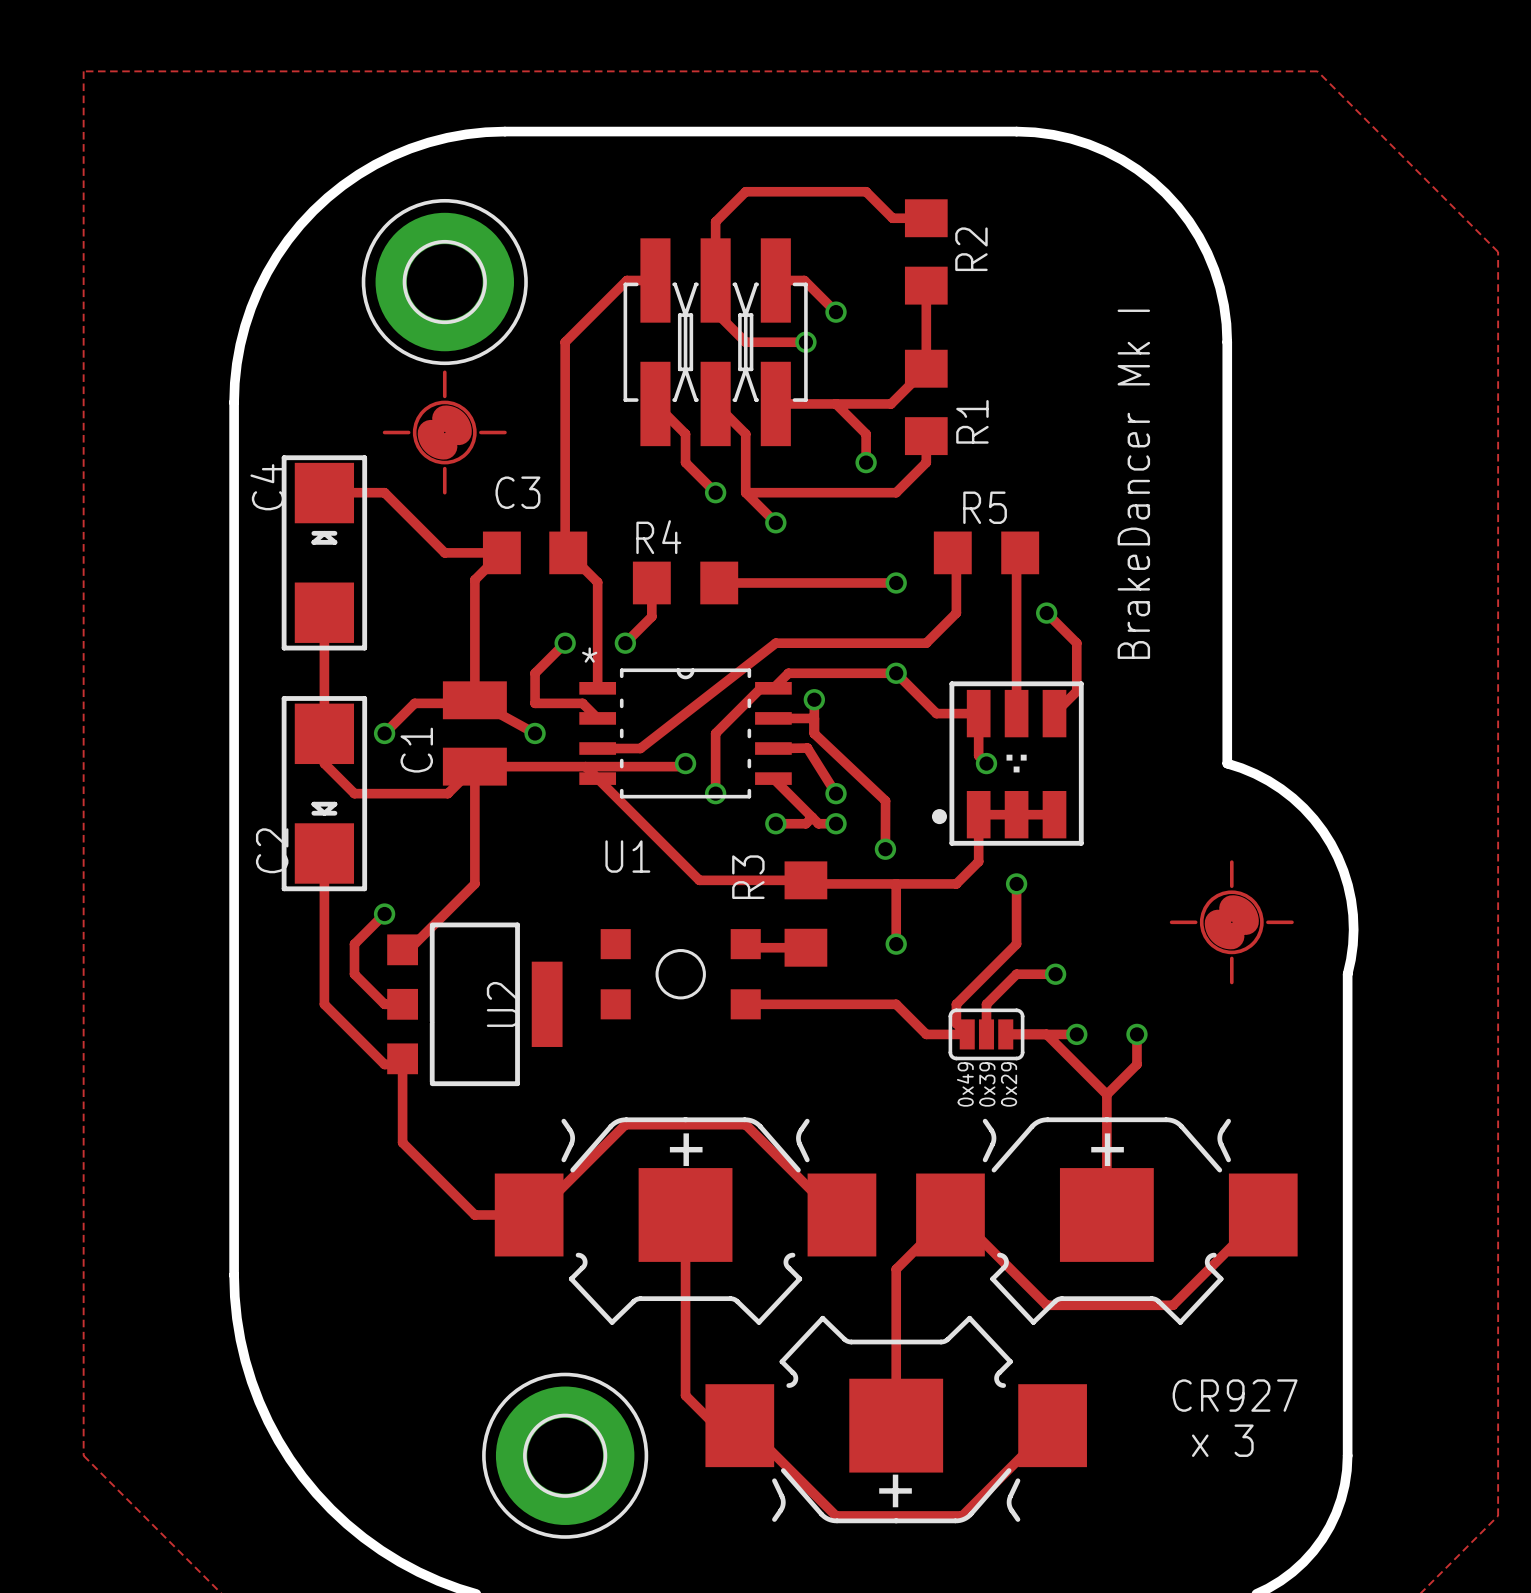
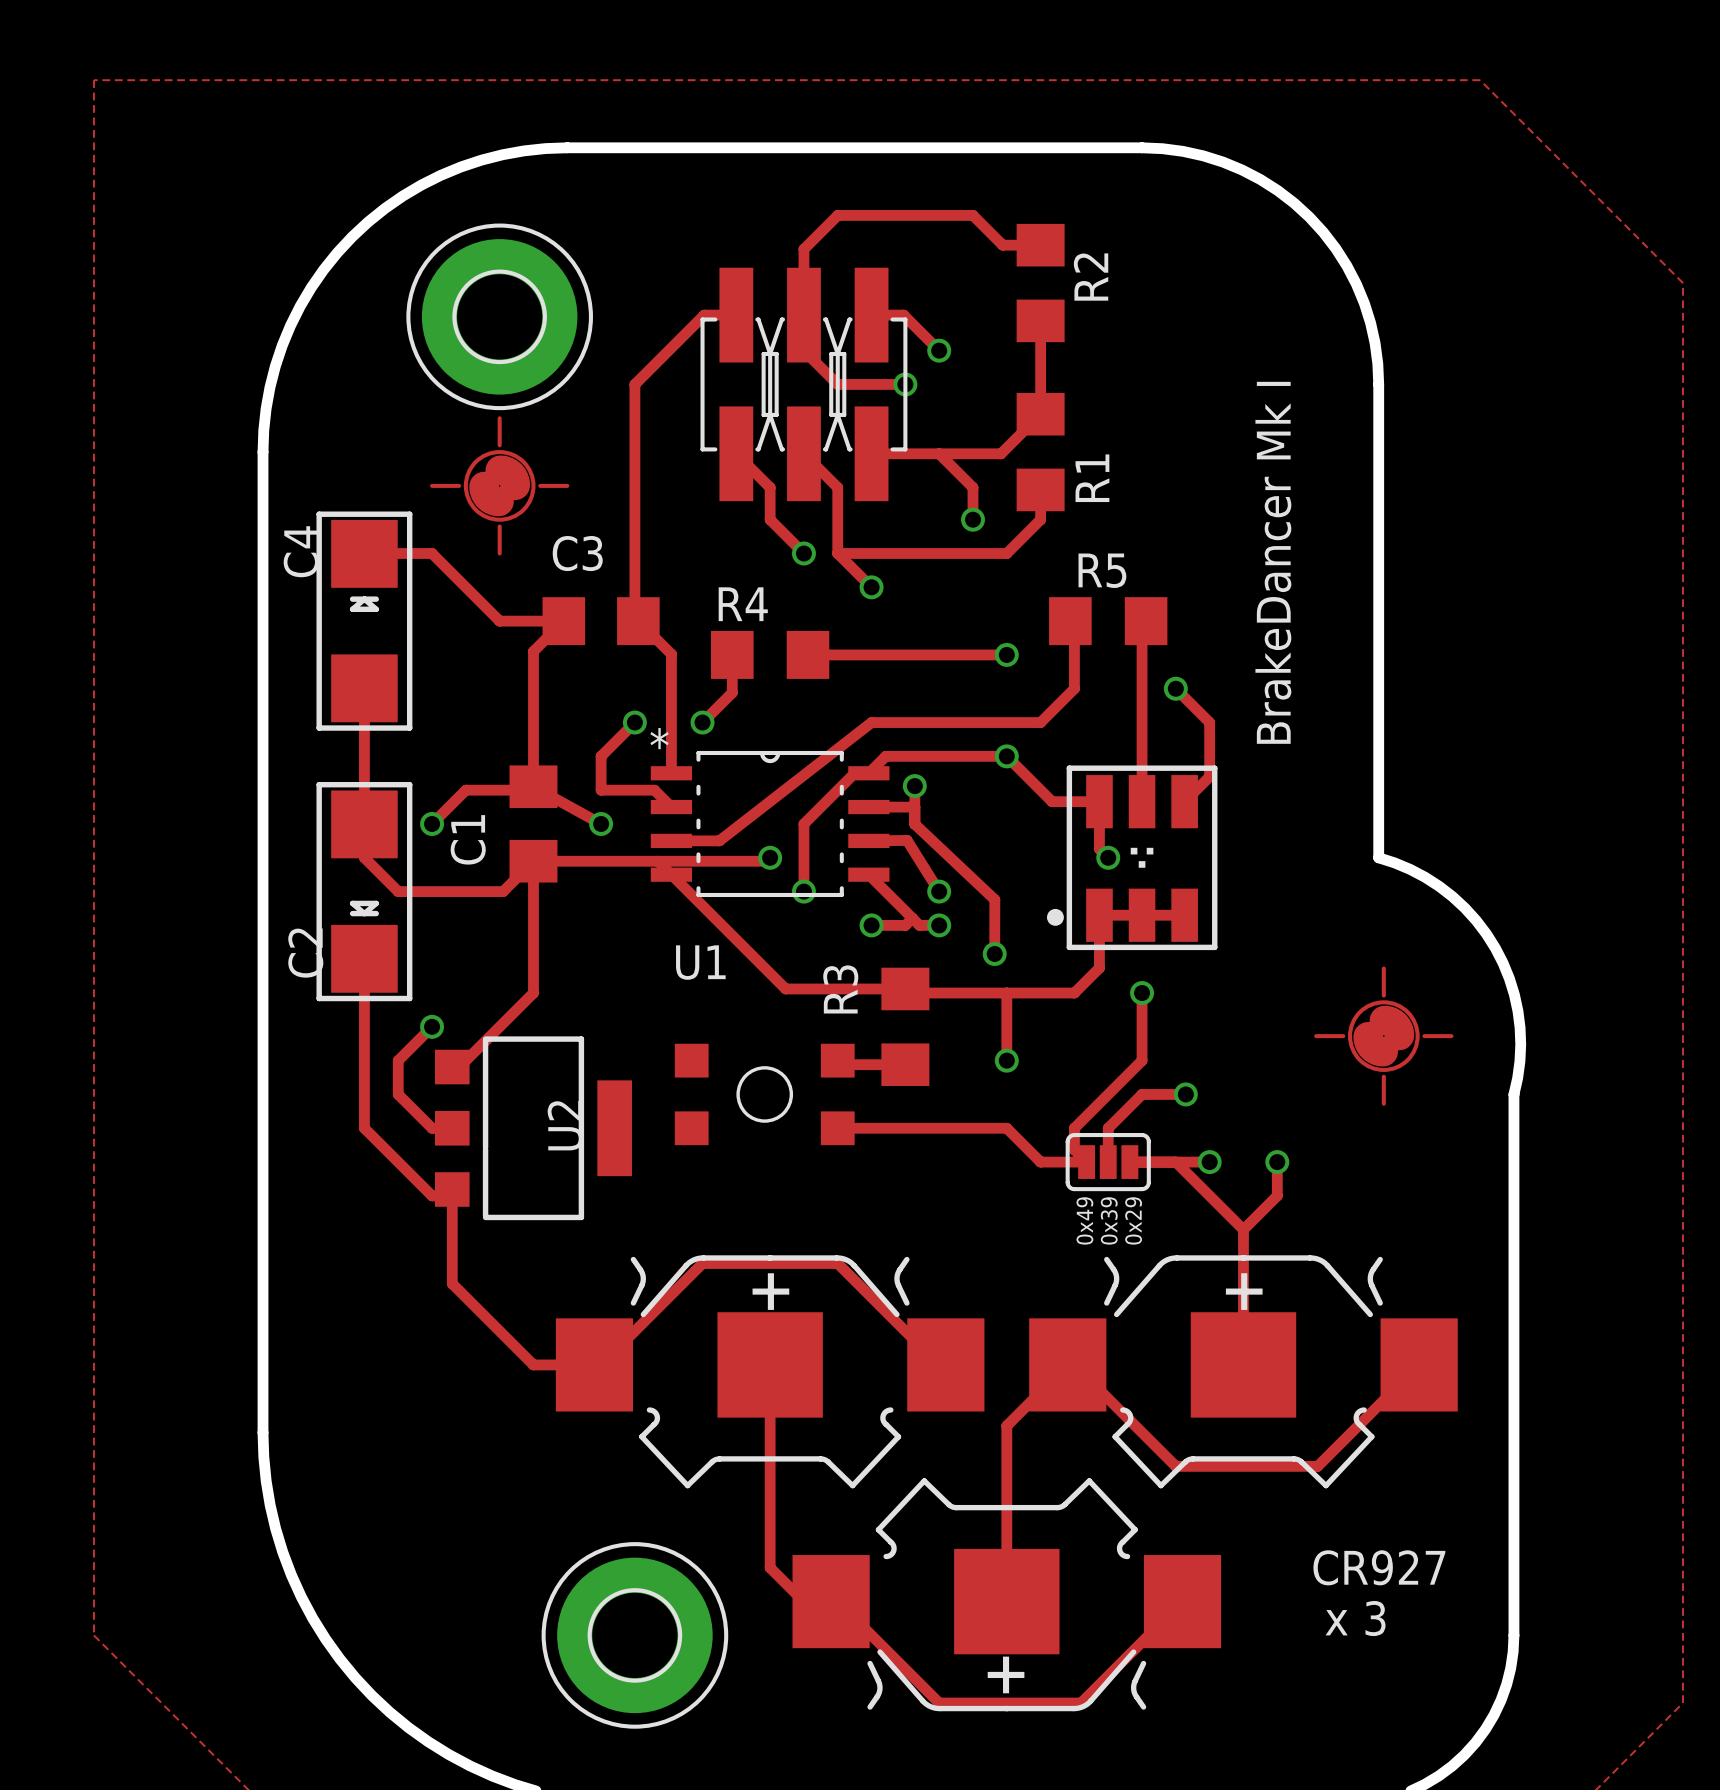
C1 footprint: [442, 681, 507, 786] -> [509, 765, 558, 883]

